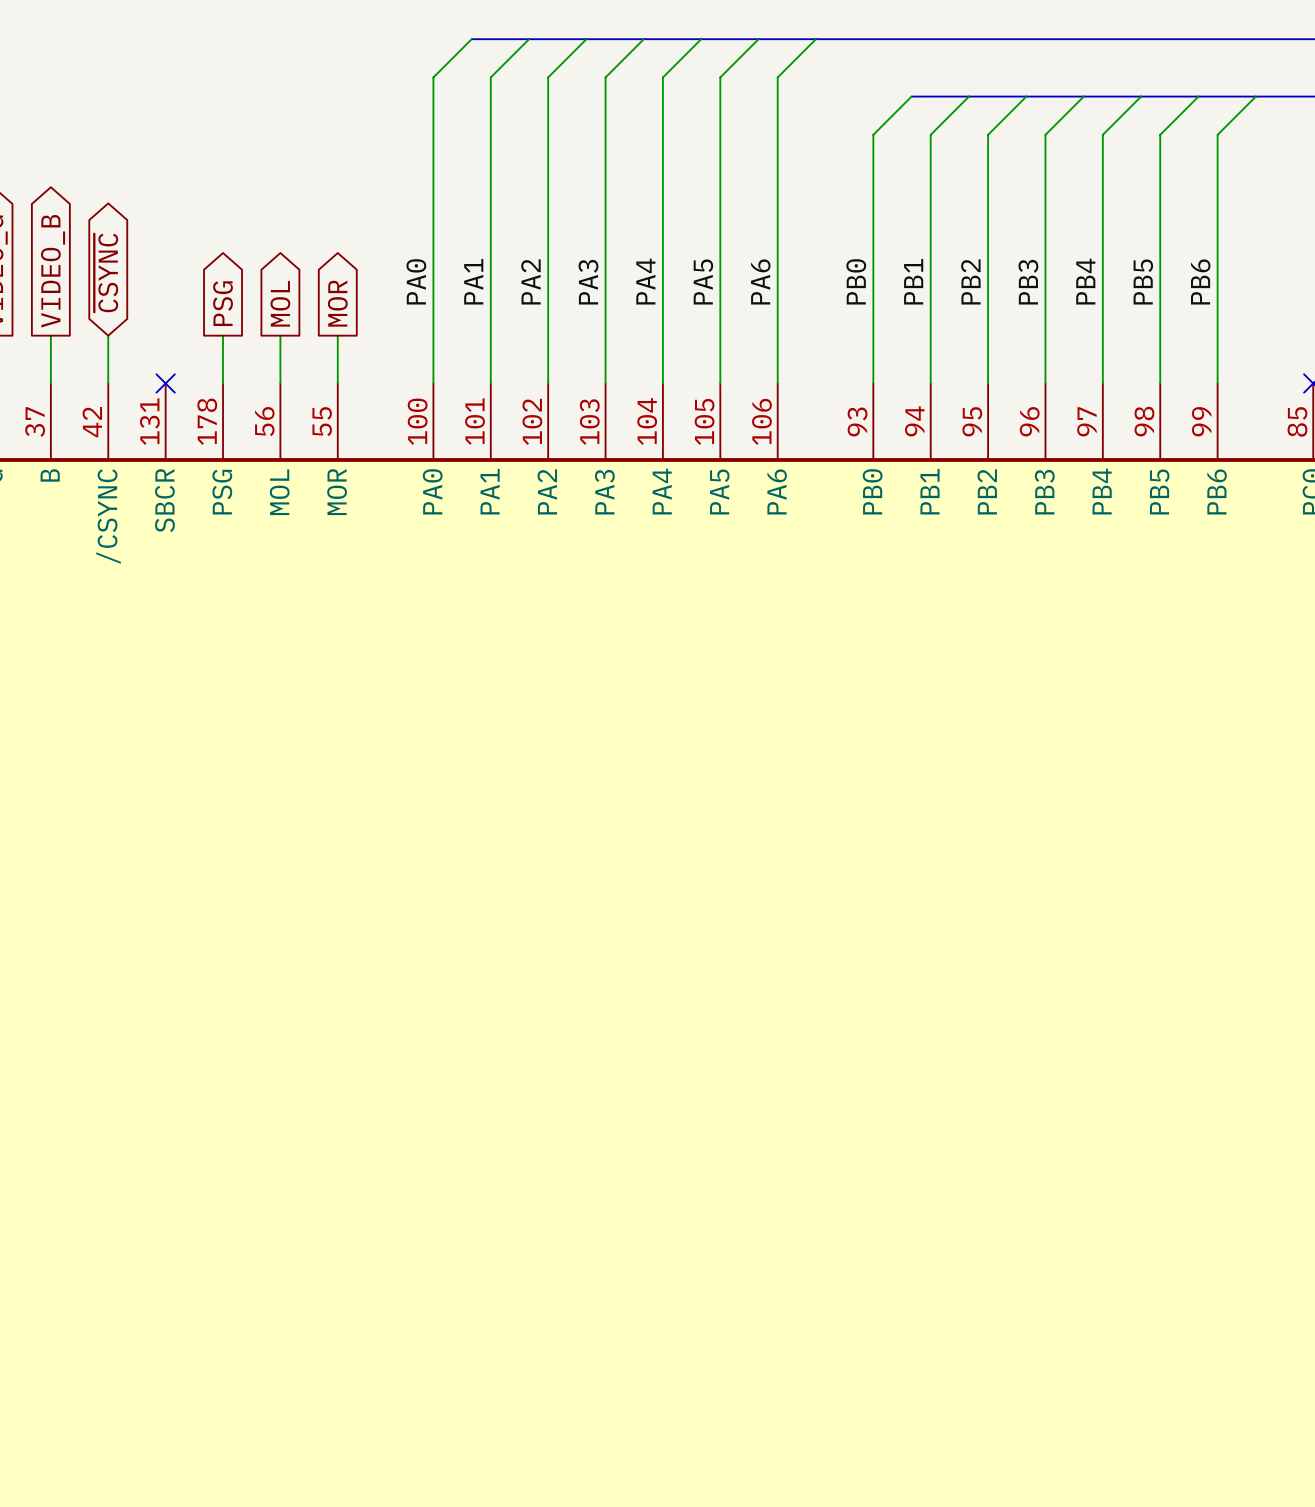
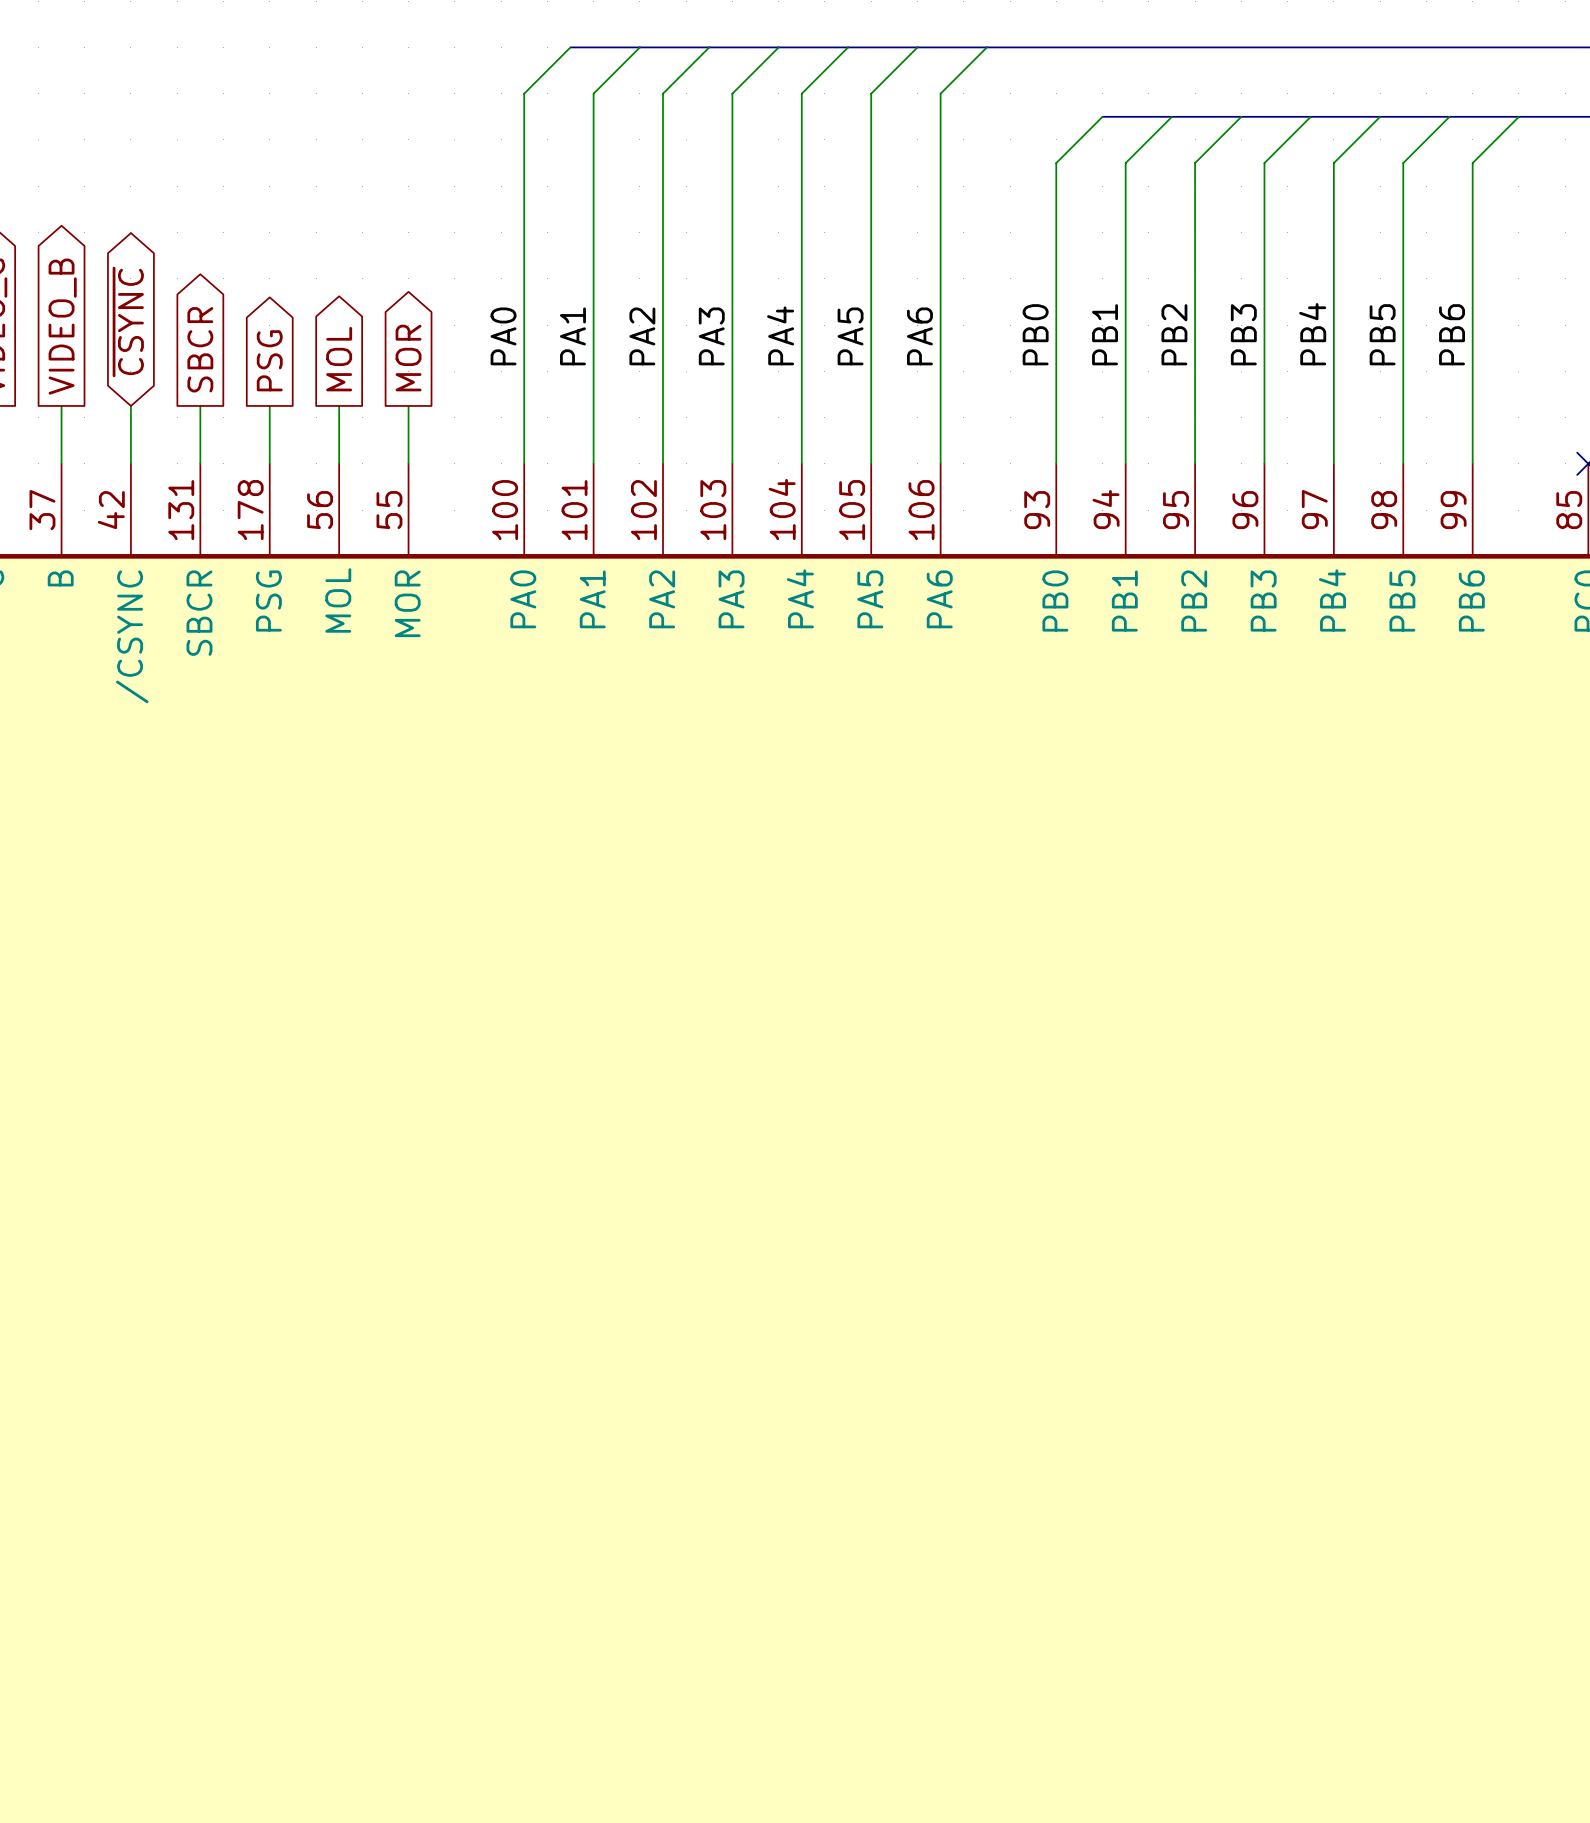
global label: none -> SBCR (200, 349)
wire: none -> (200, 405) (200, 463)
no-connect mark: (165, 383) -> none

